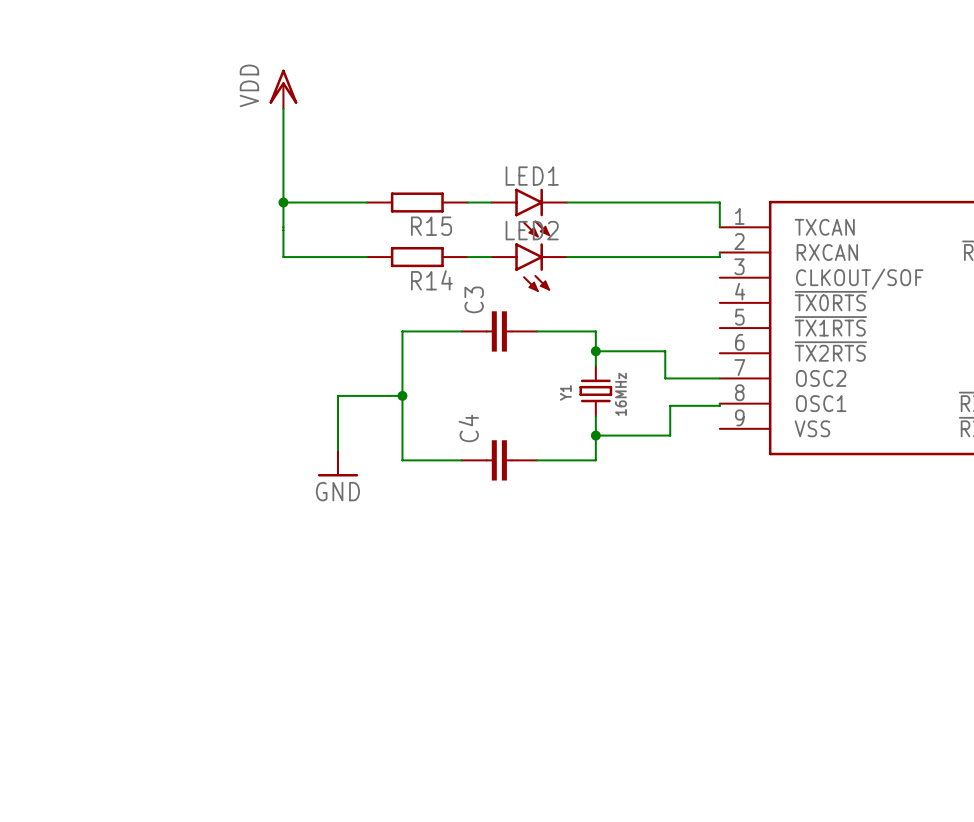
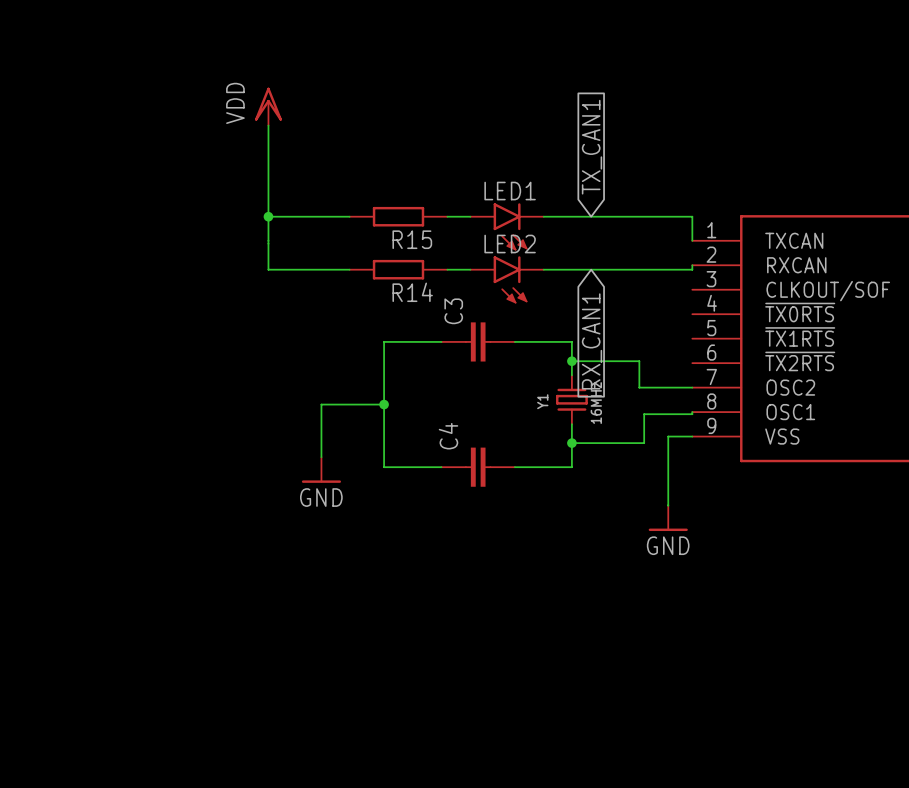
global label: none -> TX_CAN1 (592, 147)
global label: none -> RX_CAN1 (592, 341)
wire: none -> (692, 436) (668, 436) (668, 505)
power symbol: none -> GND (668, 518)

